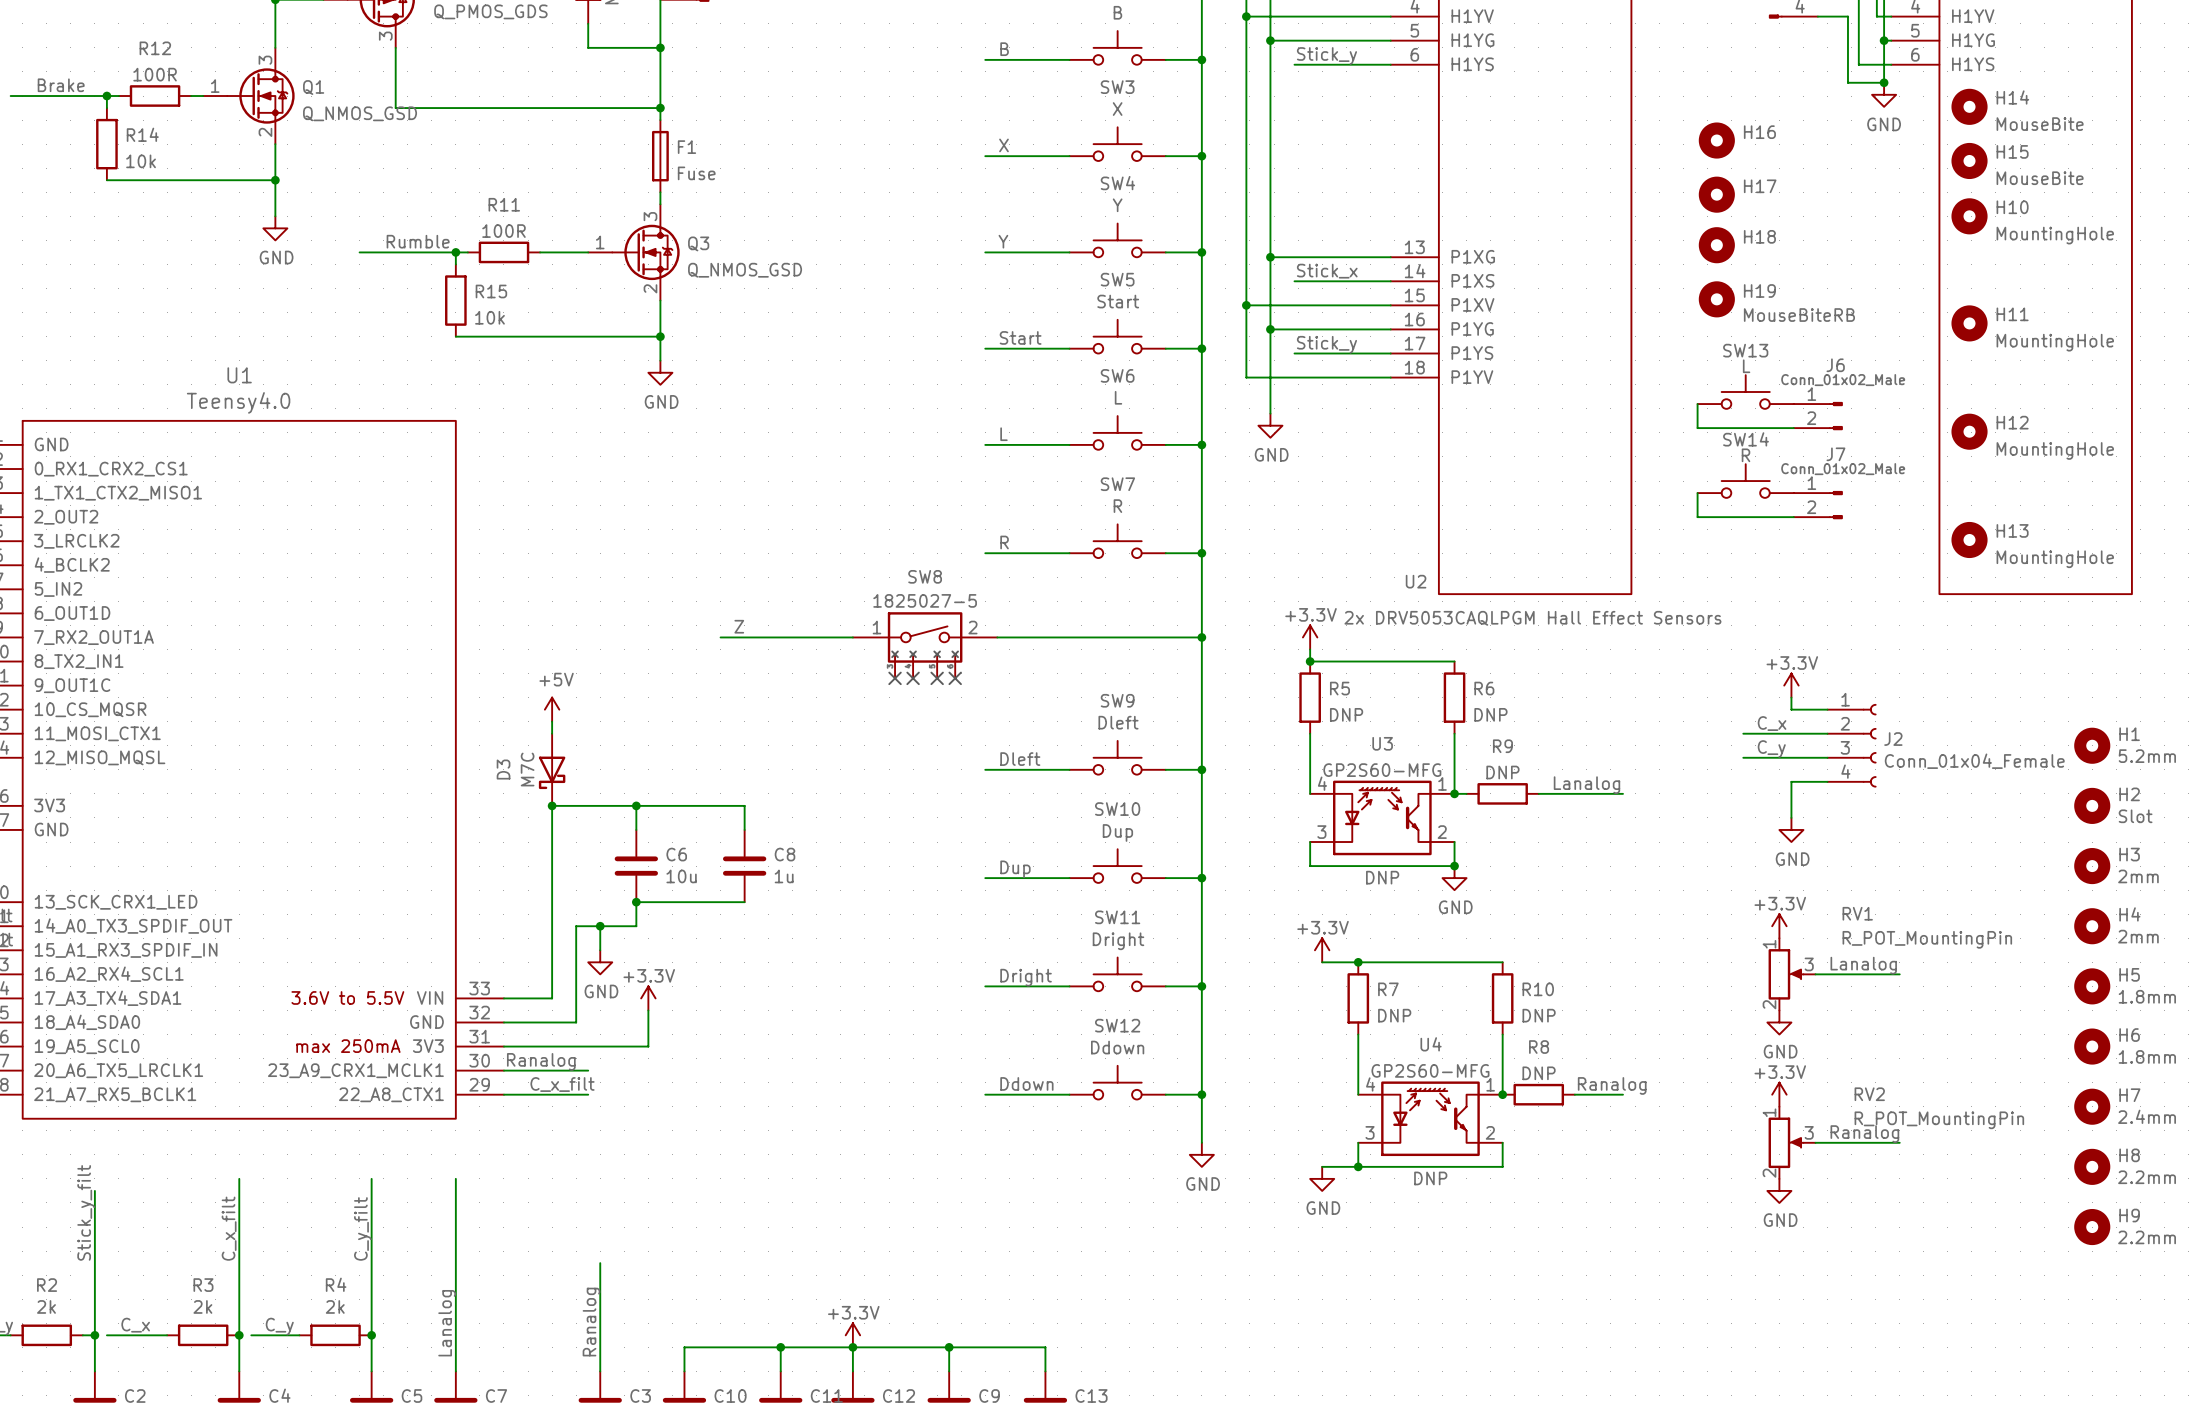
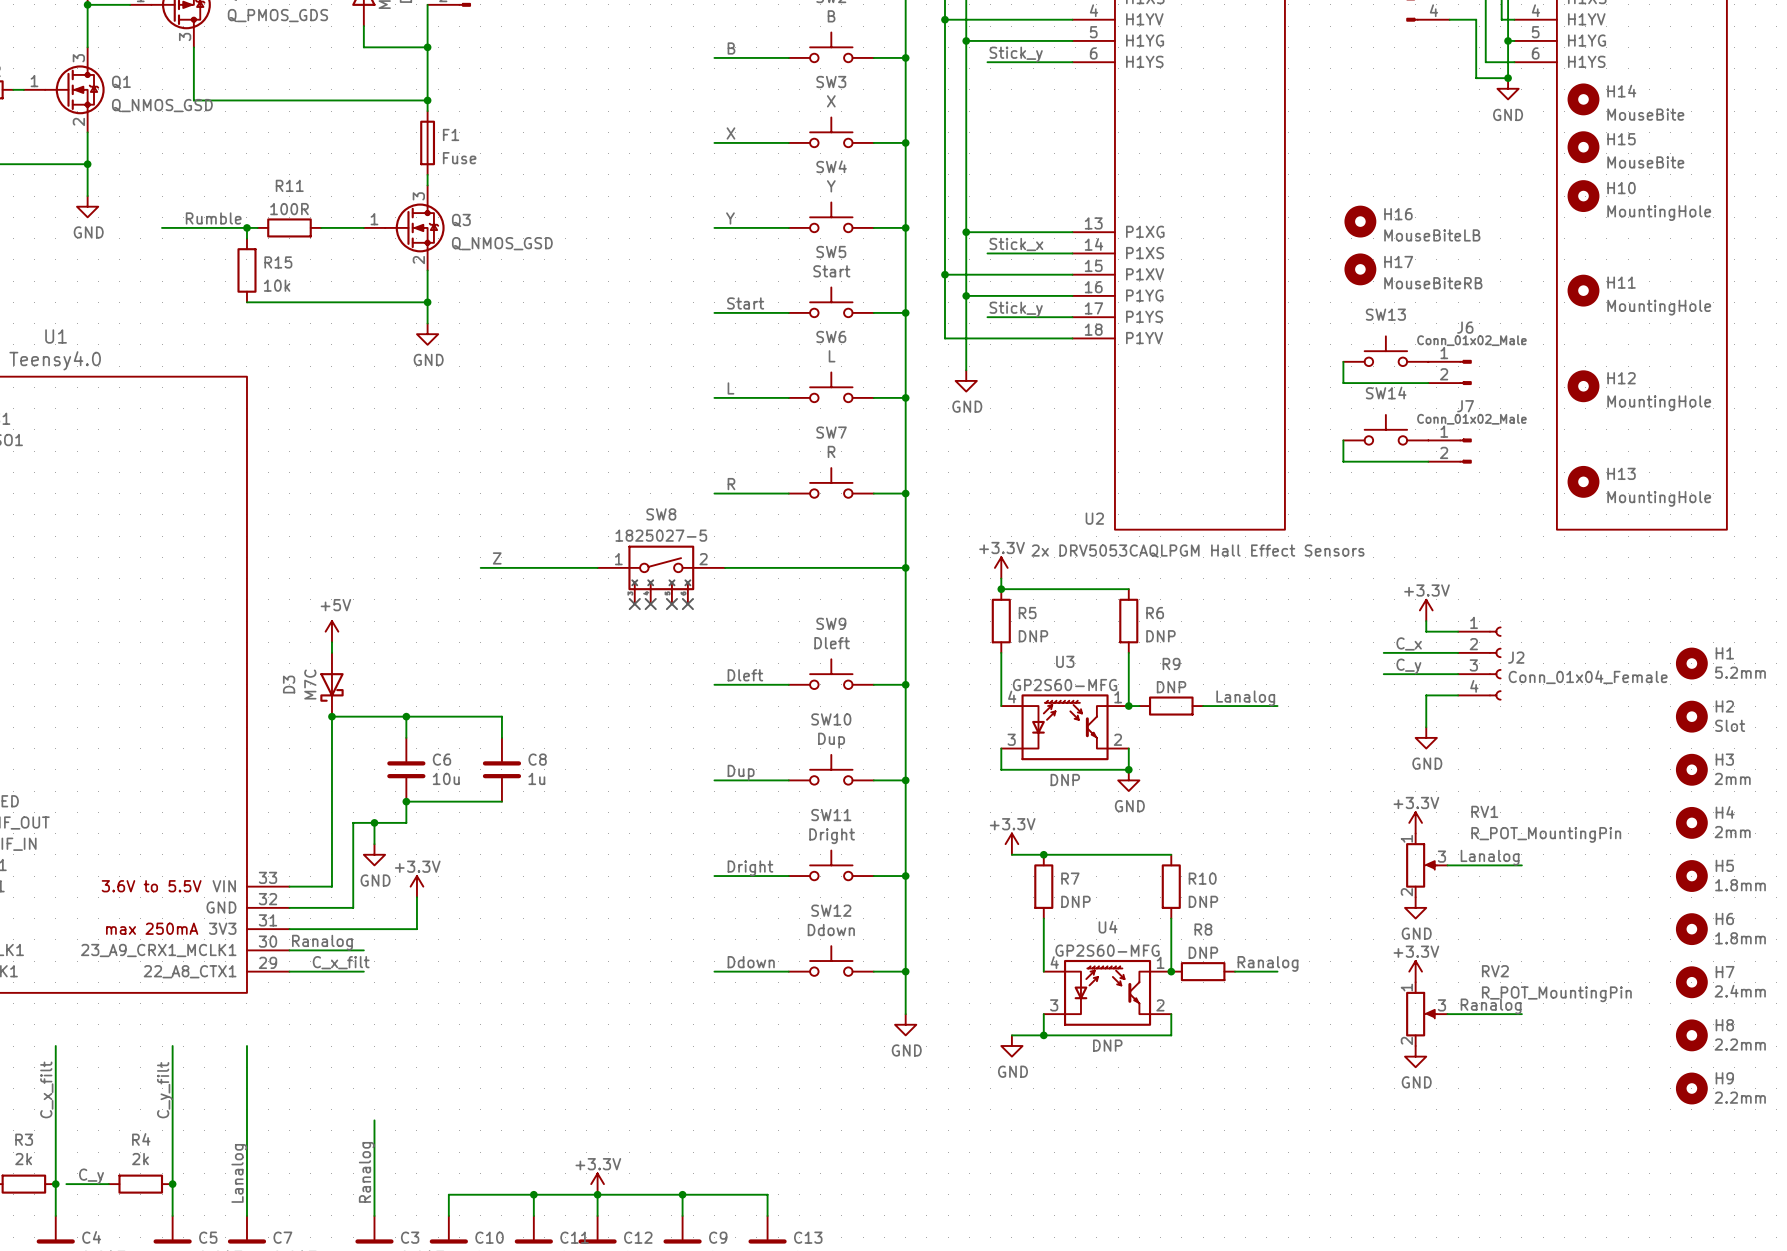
H16: (1716, 140) -> none
H17: (1716, 194) -> none
H18 name: H18 (1759, 236) -> H16 (1398, 214)
H18 value: none -> MouseBiteLB (1432, 235)
H19 name: H19 (1759, 290) -> H17 (1398, 262)
SW13 value: L (1746, 366) -> none
SW14 value: R (1746, 455) -> none

